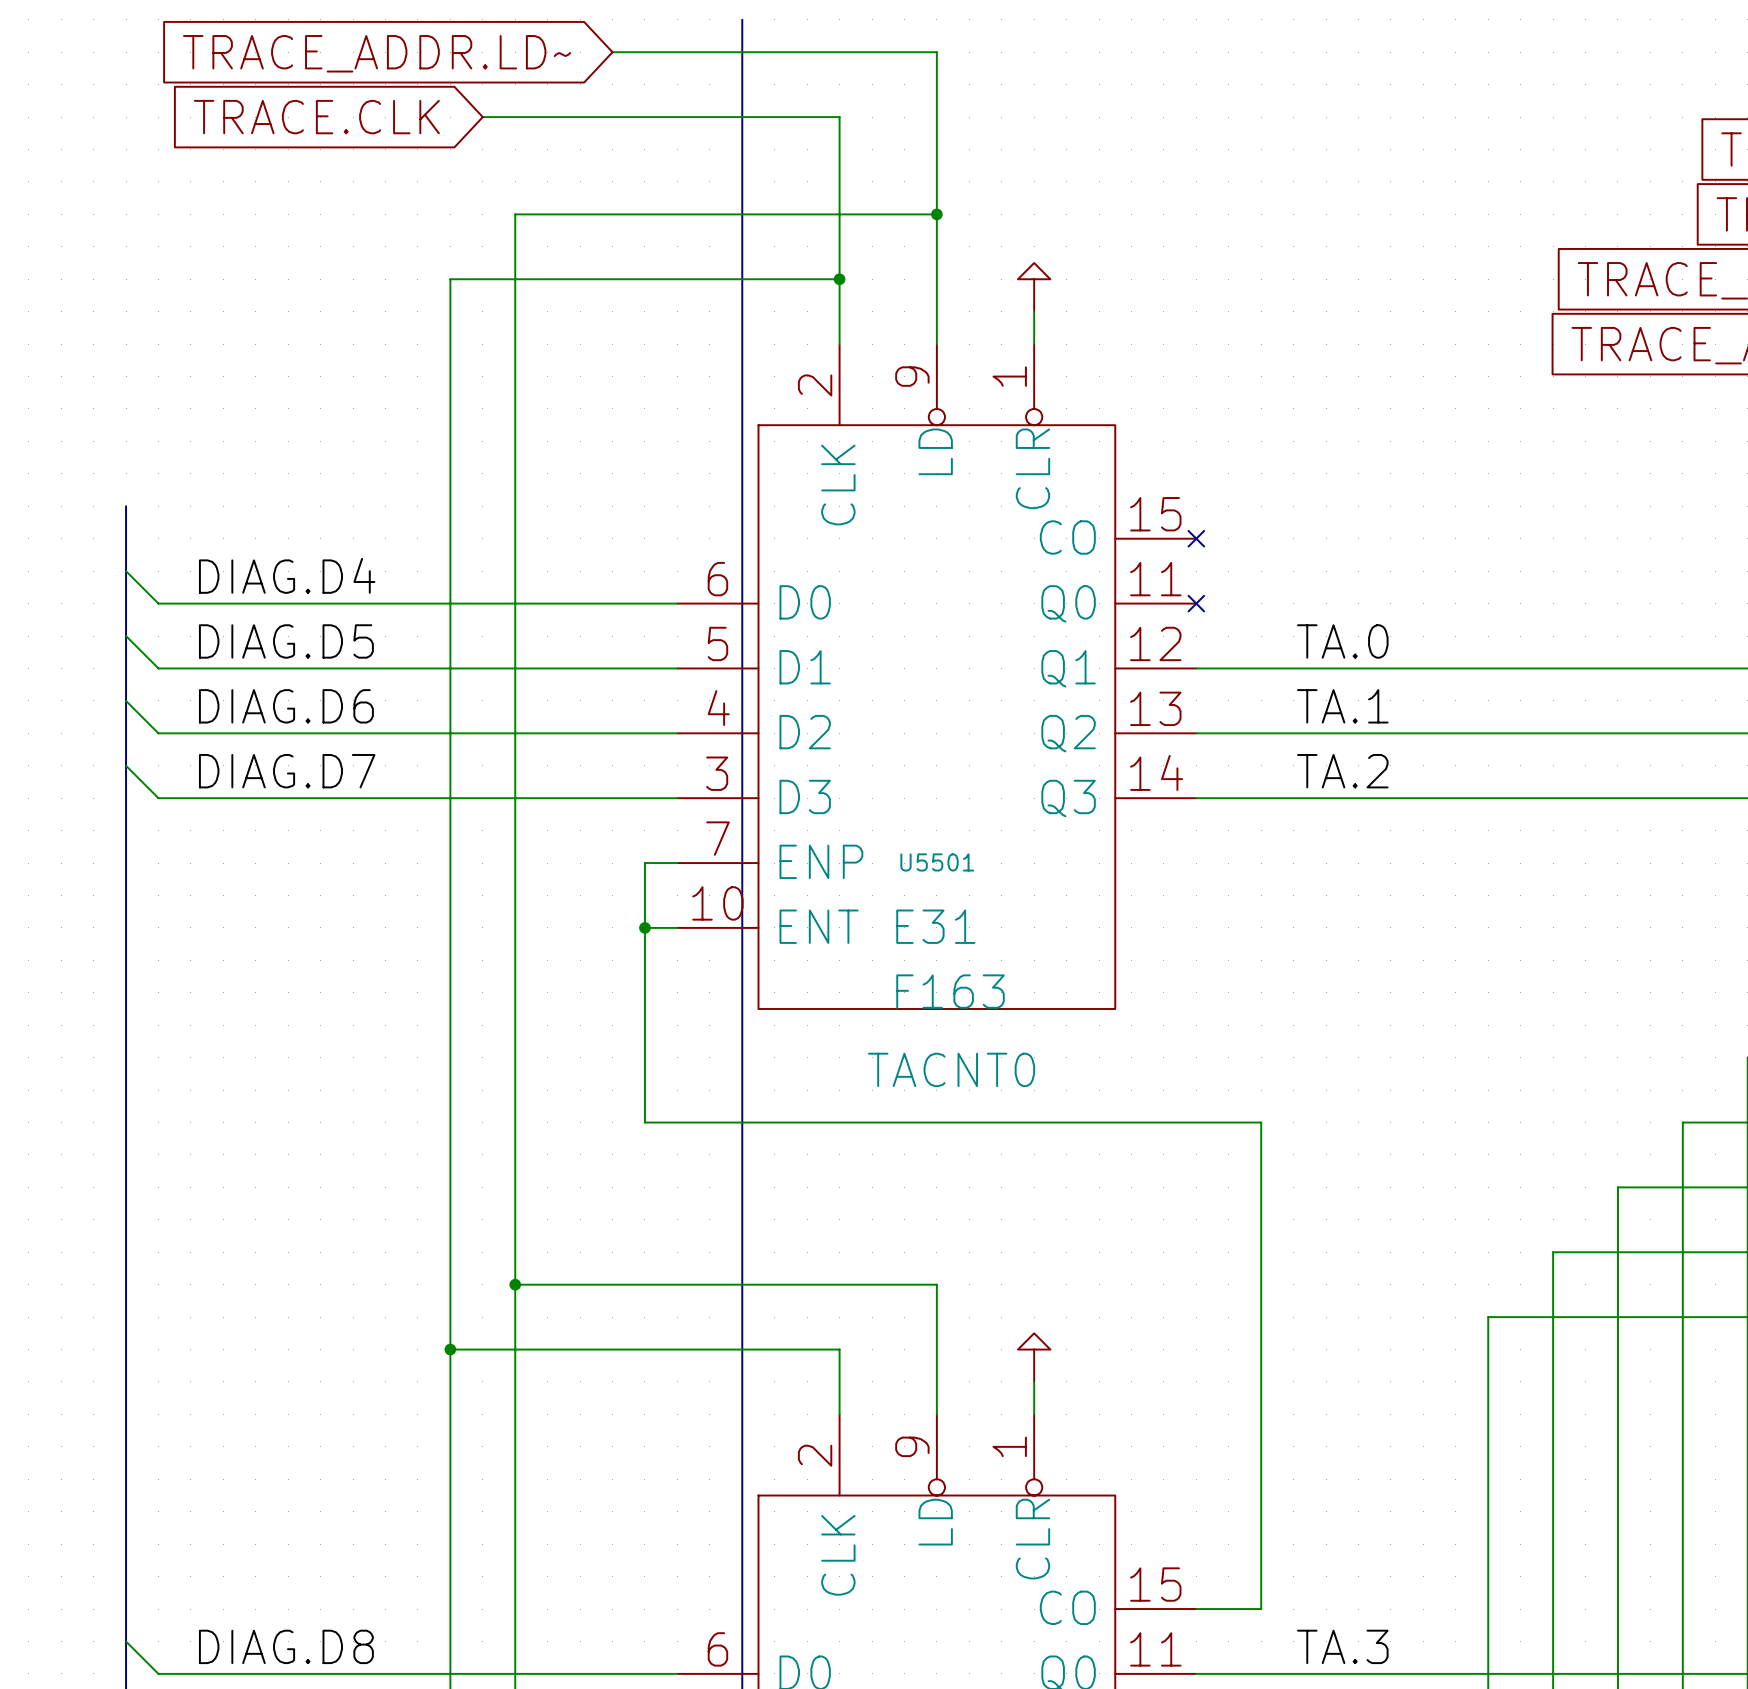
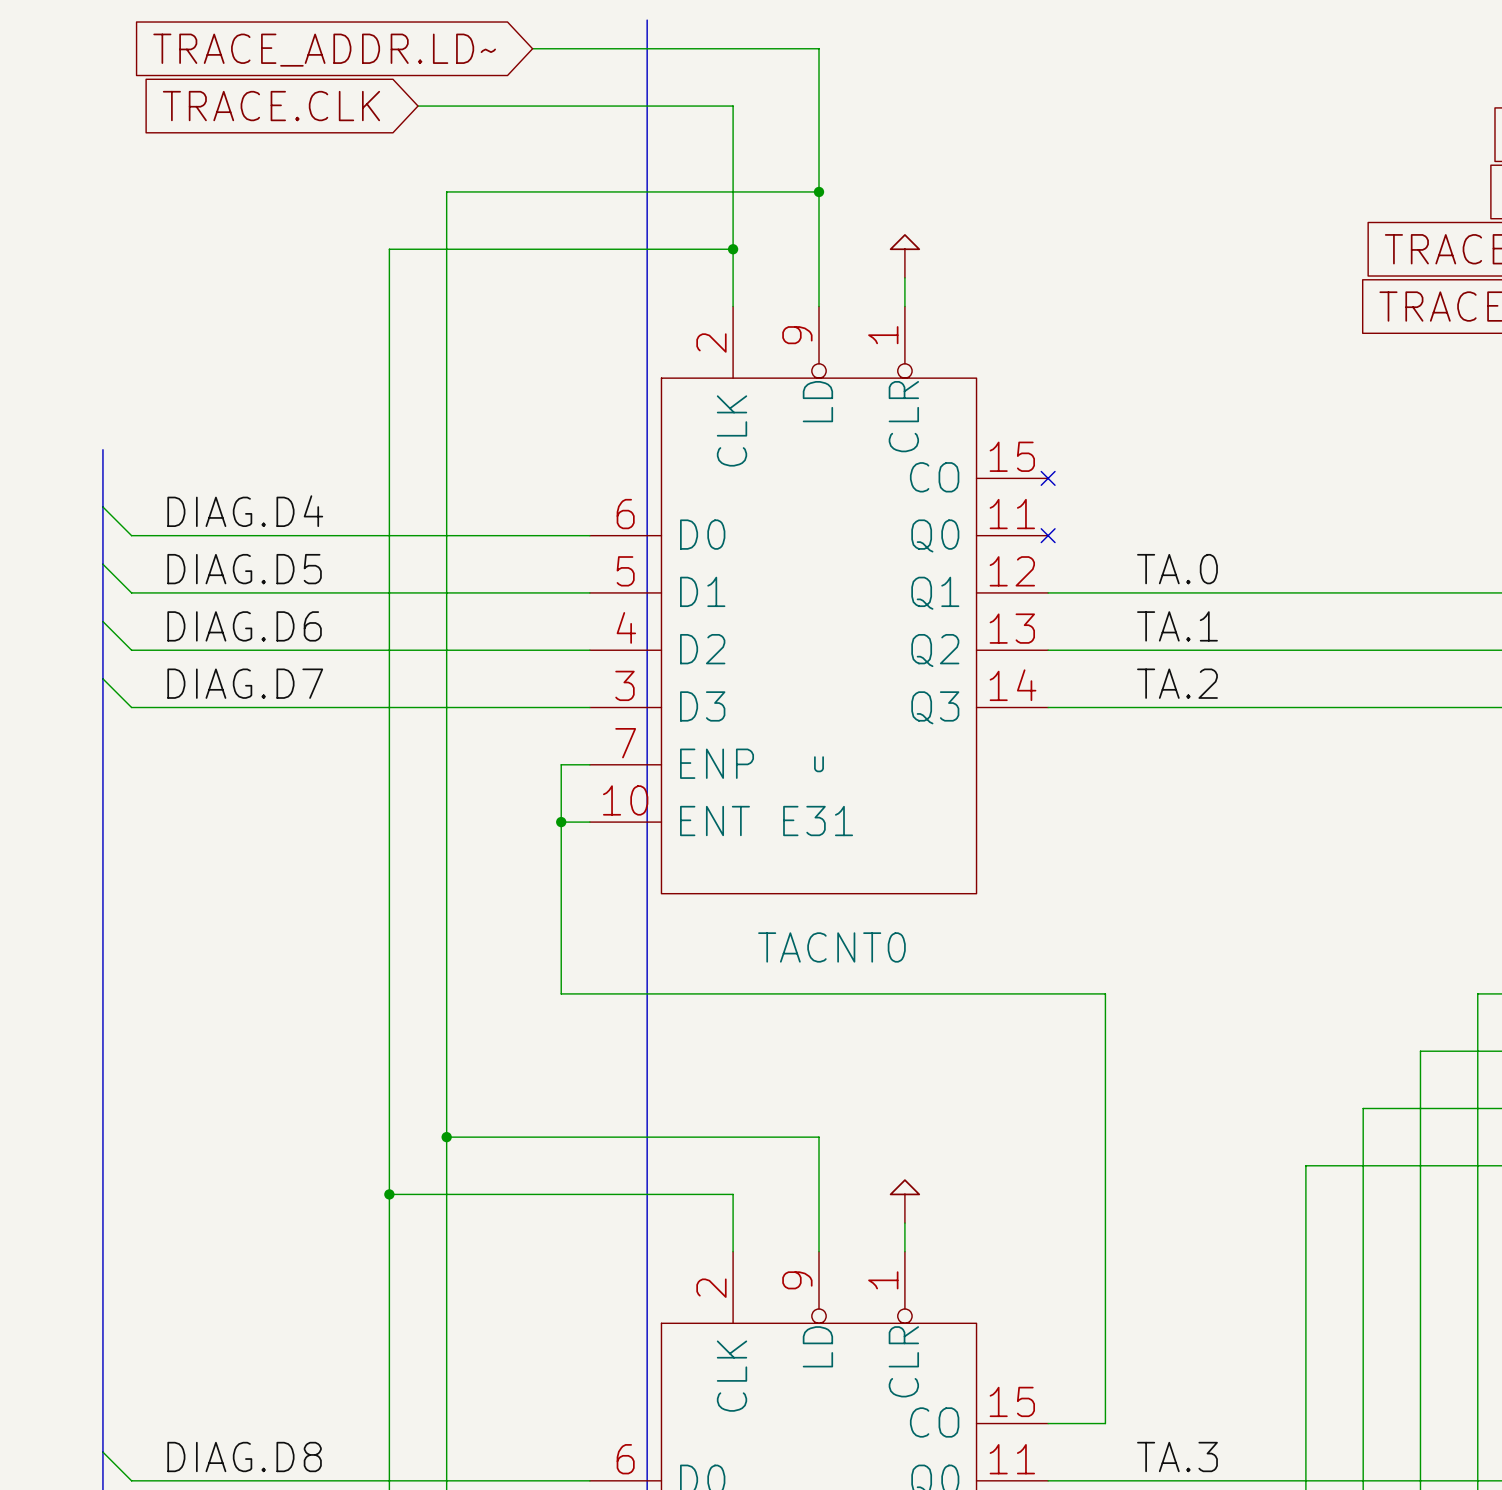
U5501 name: U5501 (937, 862) -> U (819, 764)
U5501 value: F163 (950, 991) -> none

